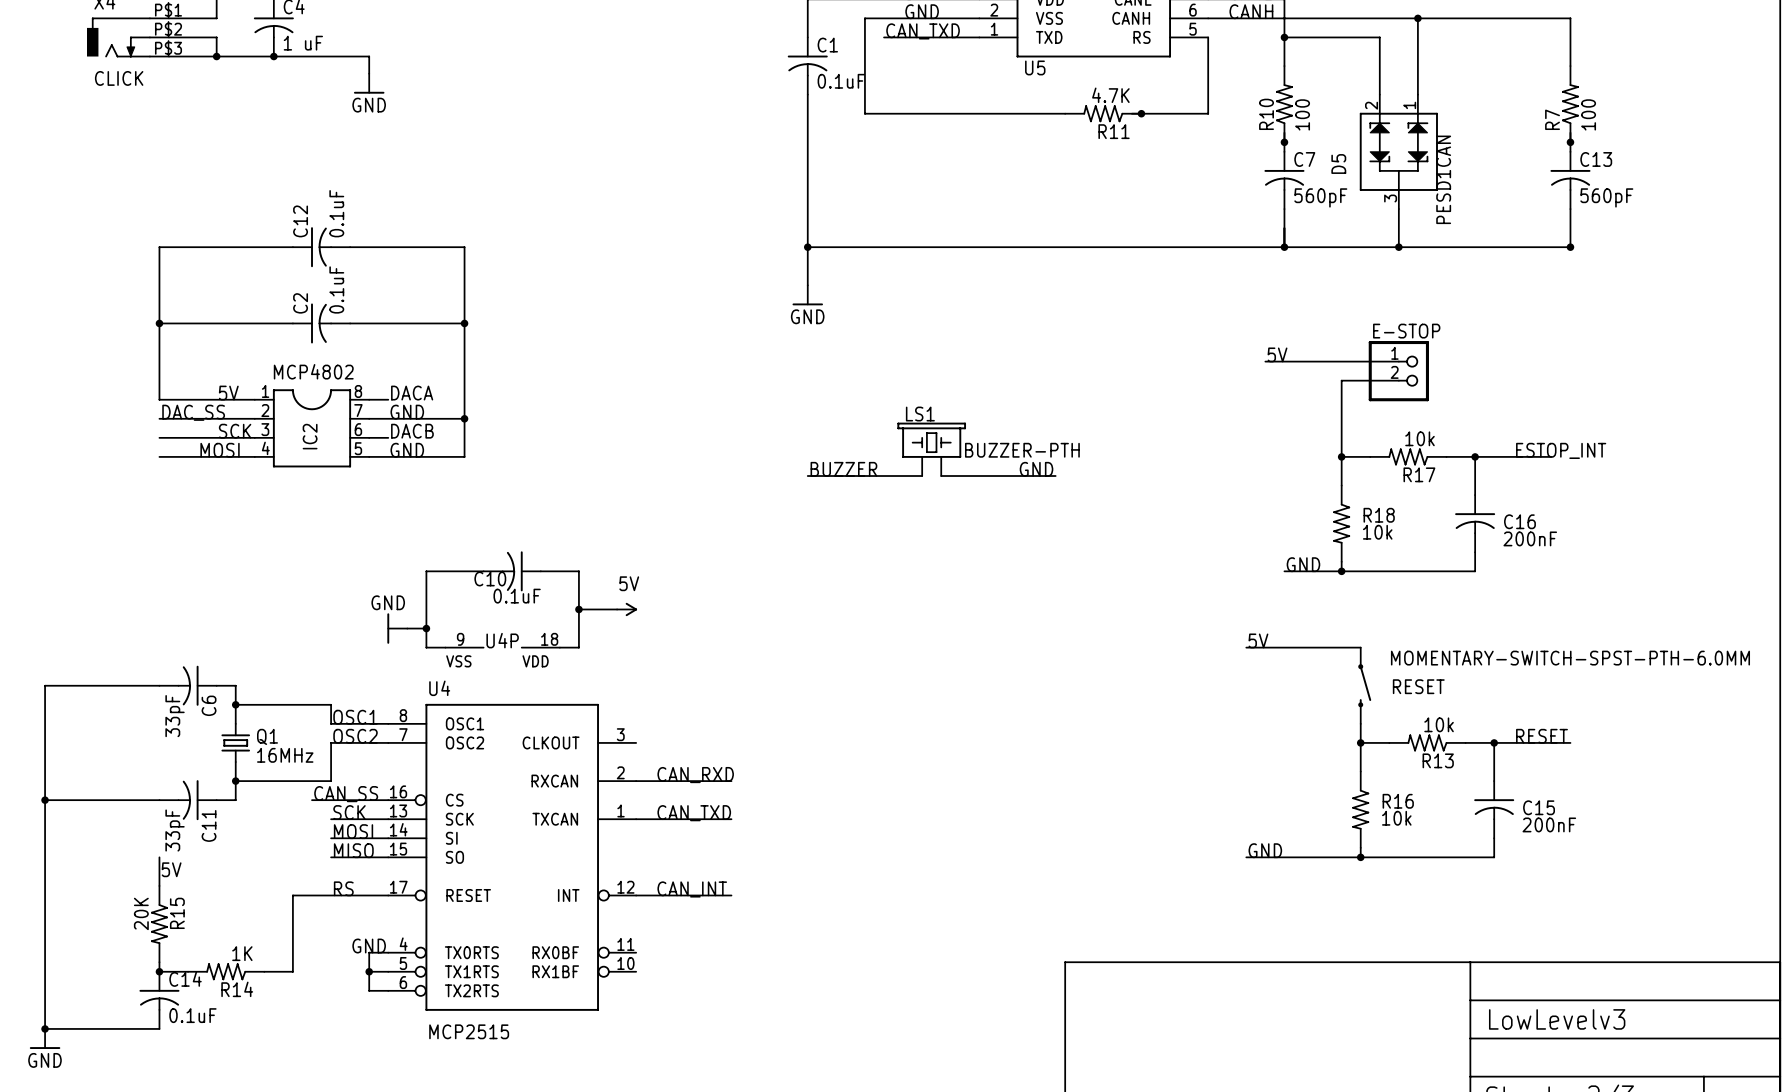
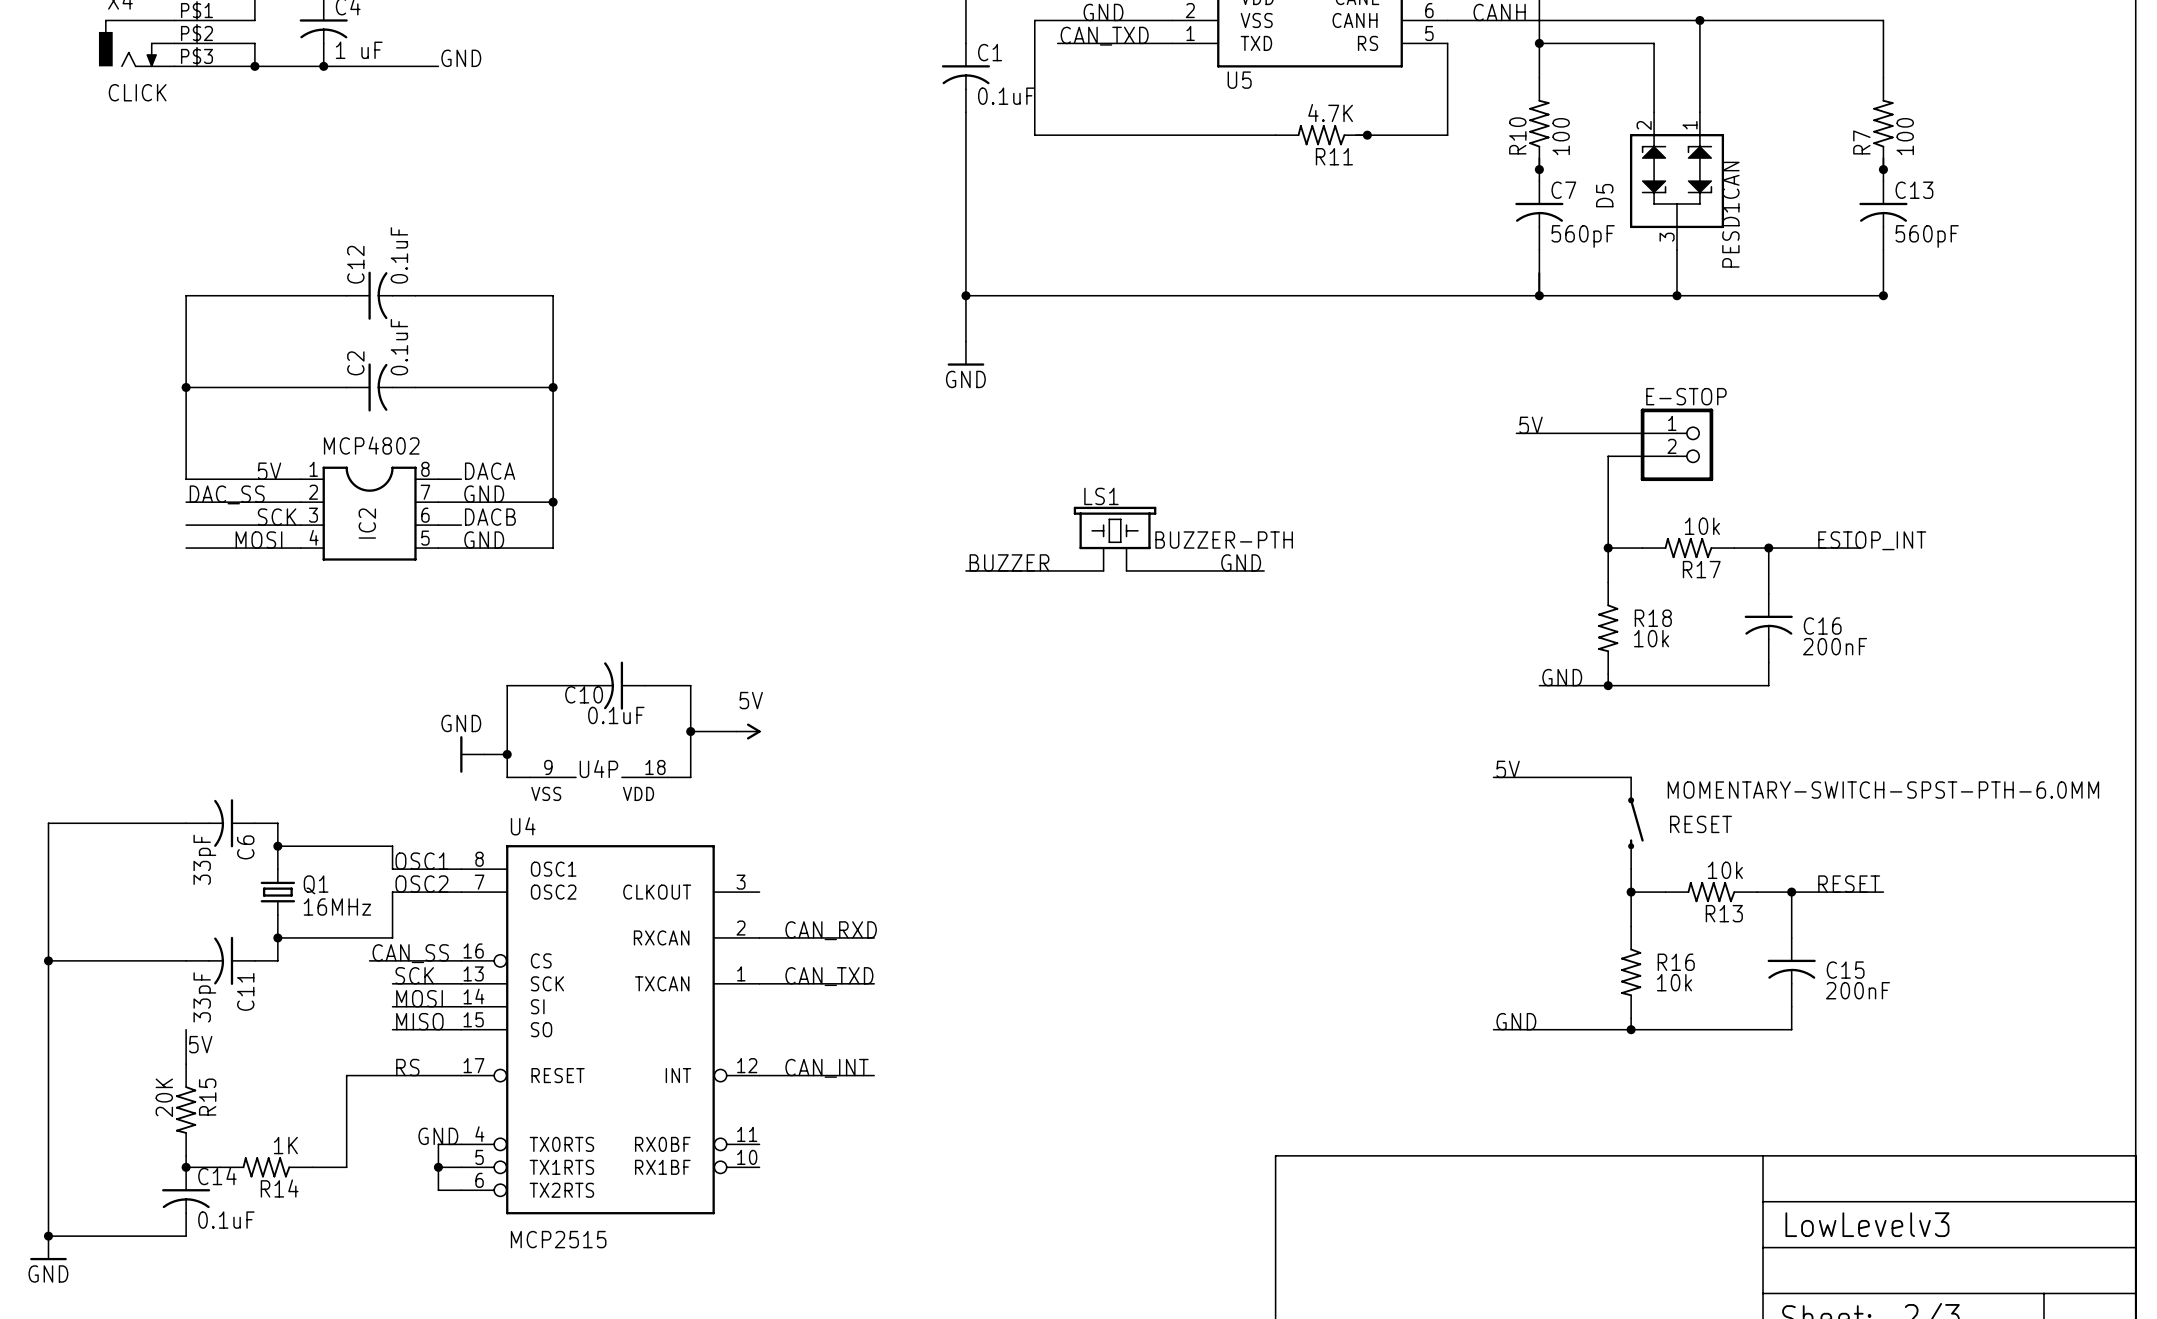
label: none -> GND (461, 58)
wire: (369, 56) (369, 73) -> none
power symbol: GND (369, 83) -> none

